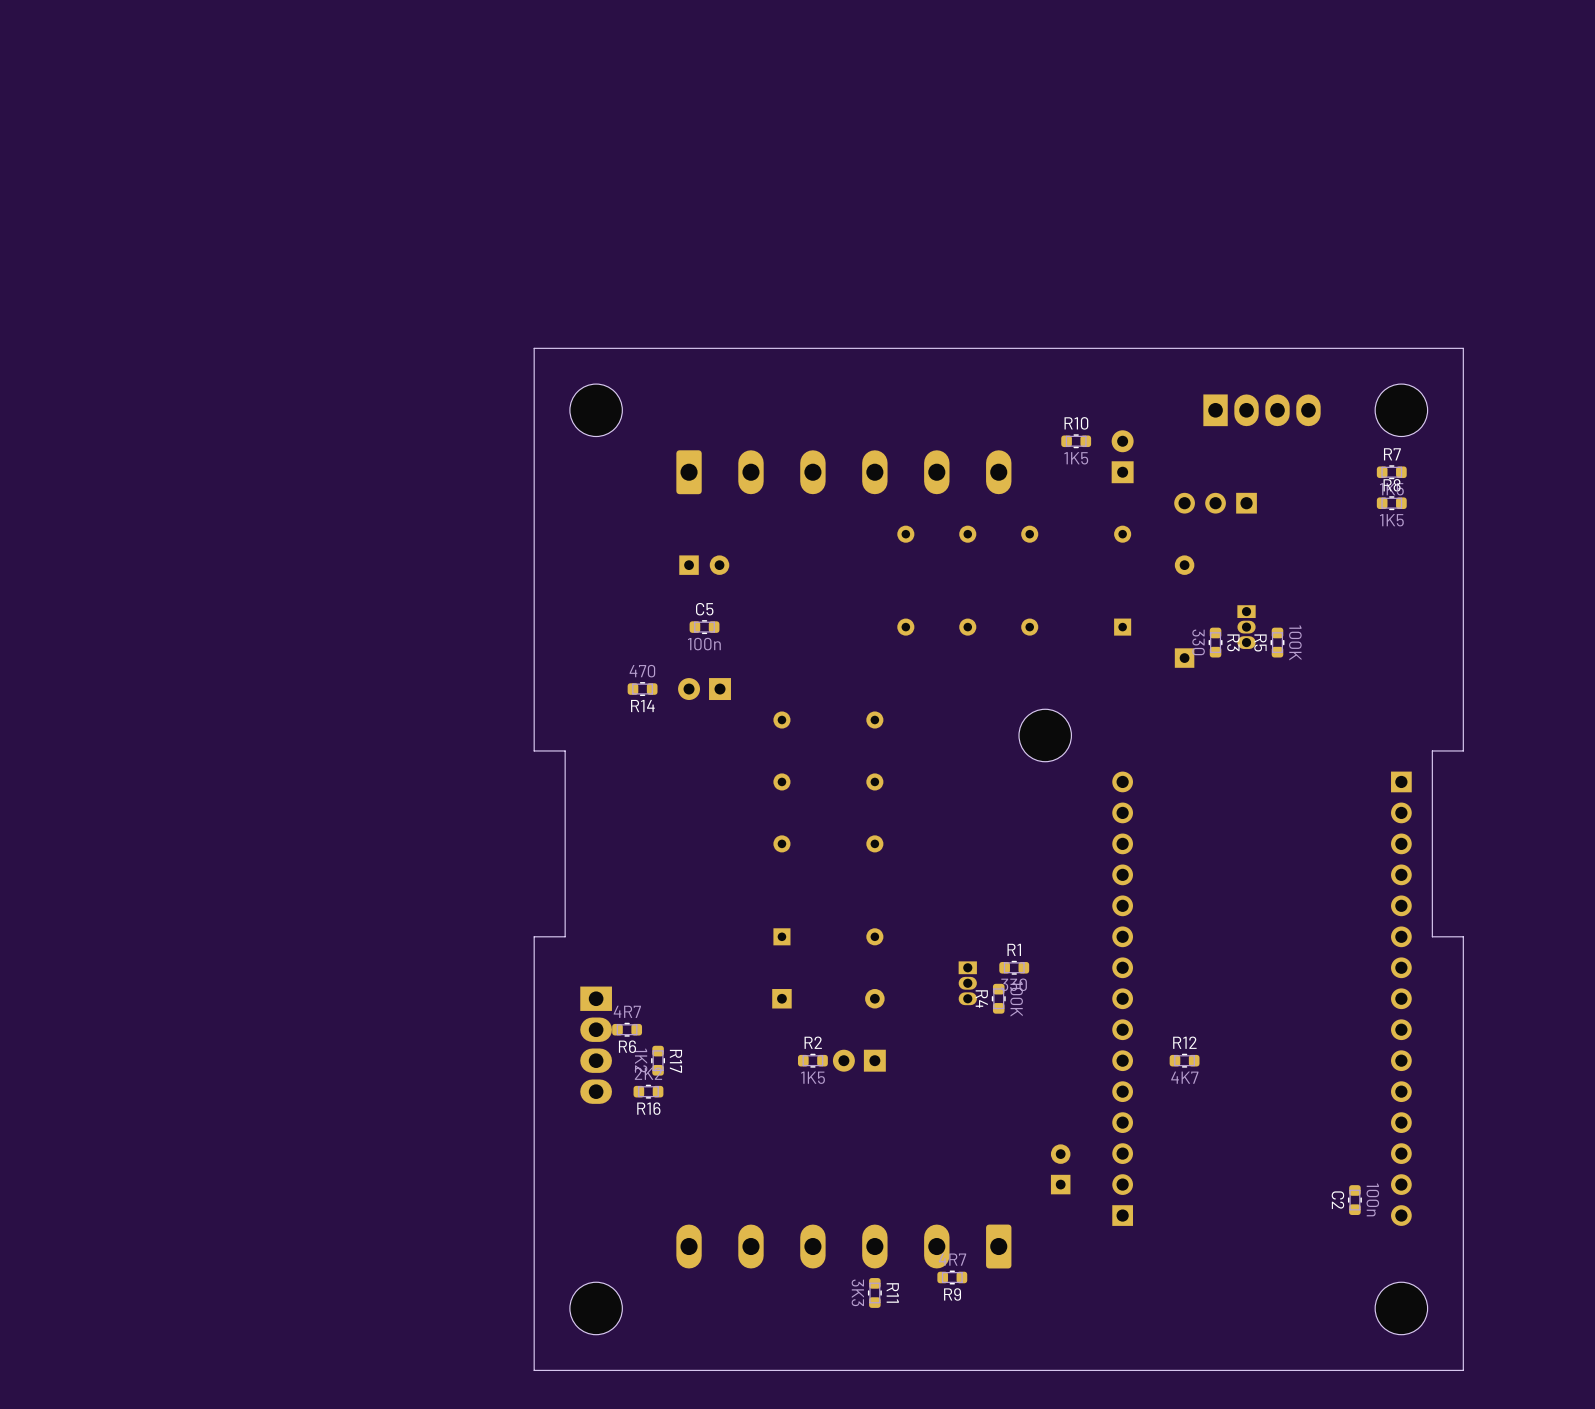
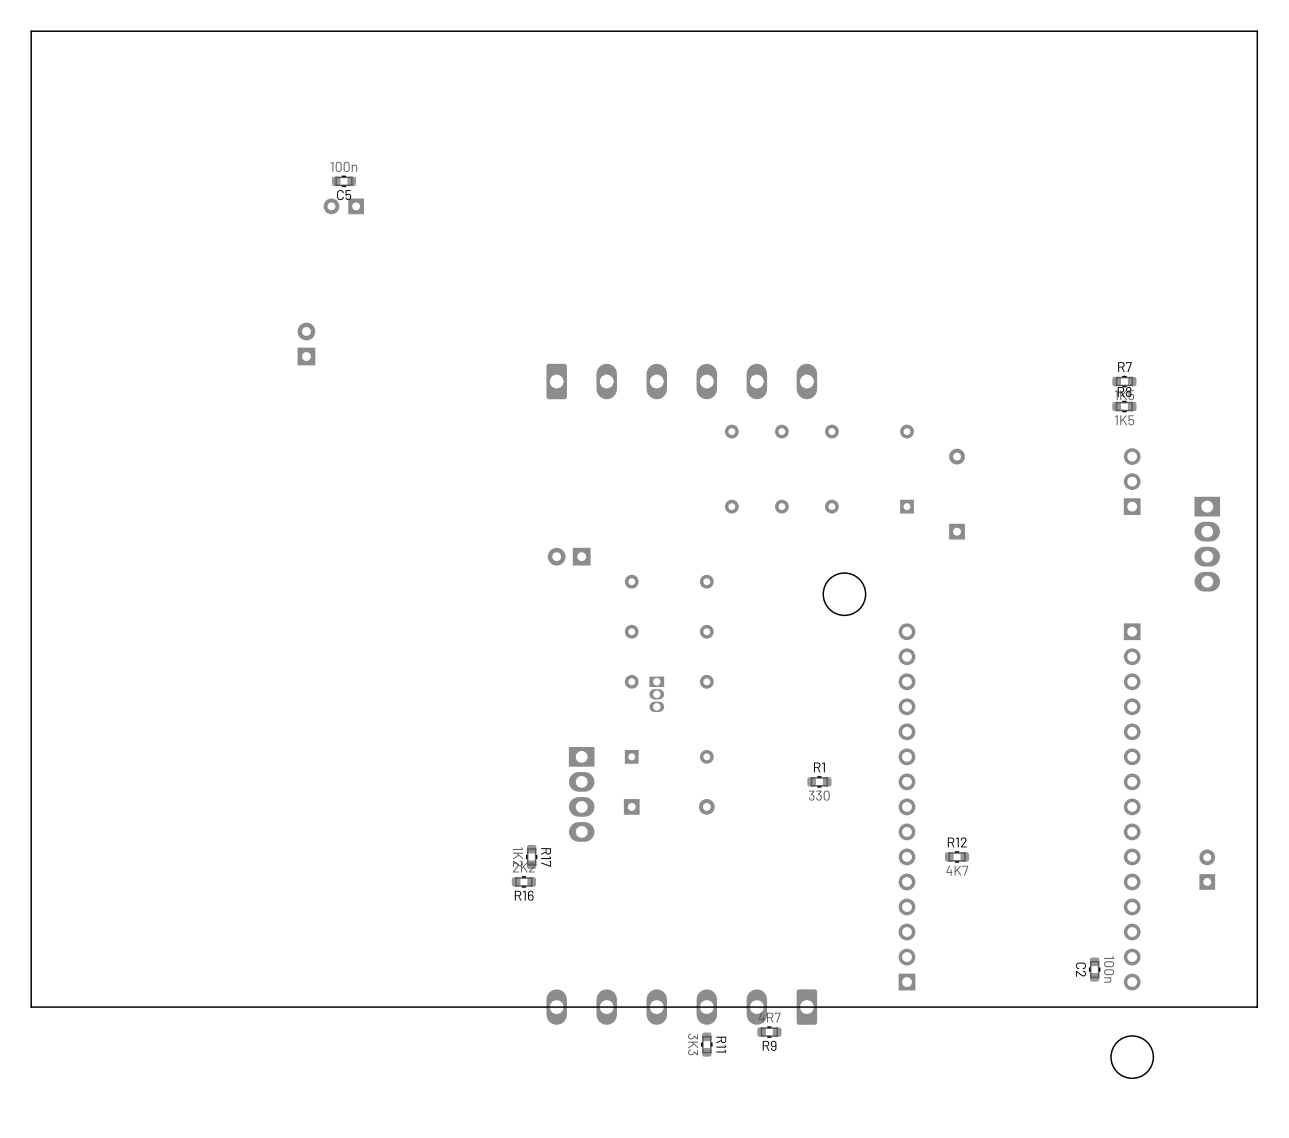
board edge: none -> (1257, 31) (1257, 1007) (31, 1007) (31, 31) (1257, 31)
part: none -> (343, 206)
board edge: (1463, 348) (1463, 750) (1432, 750) (1432, 936) (1463, 936) (1463, 1370) (534, 1370) (534, 936) (565, 936) (565, 750) (534, 750) (534, 348) (1463, 348) -> none
part: (596, 410) -> none
part: (1262, 410) -> none
part: (1401, 410) -> none
part: none -> (306, 343)
R10: 1K5 (1076, 441) -> none
part: (1122, 456) -> none
part rotation: 0° (1215, 503) -> 90° clockwise (1132, 481)
part position: (1215, 503) -> (1132, 481)
part: (704, 565) -> none
C5 name position: C5 (704, 609) -> C5 (344, 195)
C5 position: (704, 627) -> (343, 181)
part: (1246, 627) -> none
R3: 330 (1215, 642) -> none
R5: 100K (1277, 642) -> none
C5 value position: 100n (704, 644) -> 100n (343, 166)
part: none -> (1207, 544)
R14: 470 (642, 689) -> none
part position: (967, 983) -> (656, 694)
R4: 100K (998, 998) -> none
R6: 4R7 (627, 1029) -> none
part position: (596, 1045) -> (581, 794)
R2: 1K5 (812, 1060) -> none
part: (859, 1060) -> none
part: none -> (1207, 869)
part: (1060, 1169) -> none
part: (596, 1308) -> none

